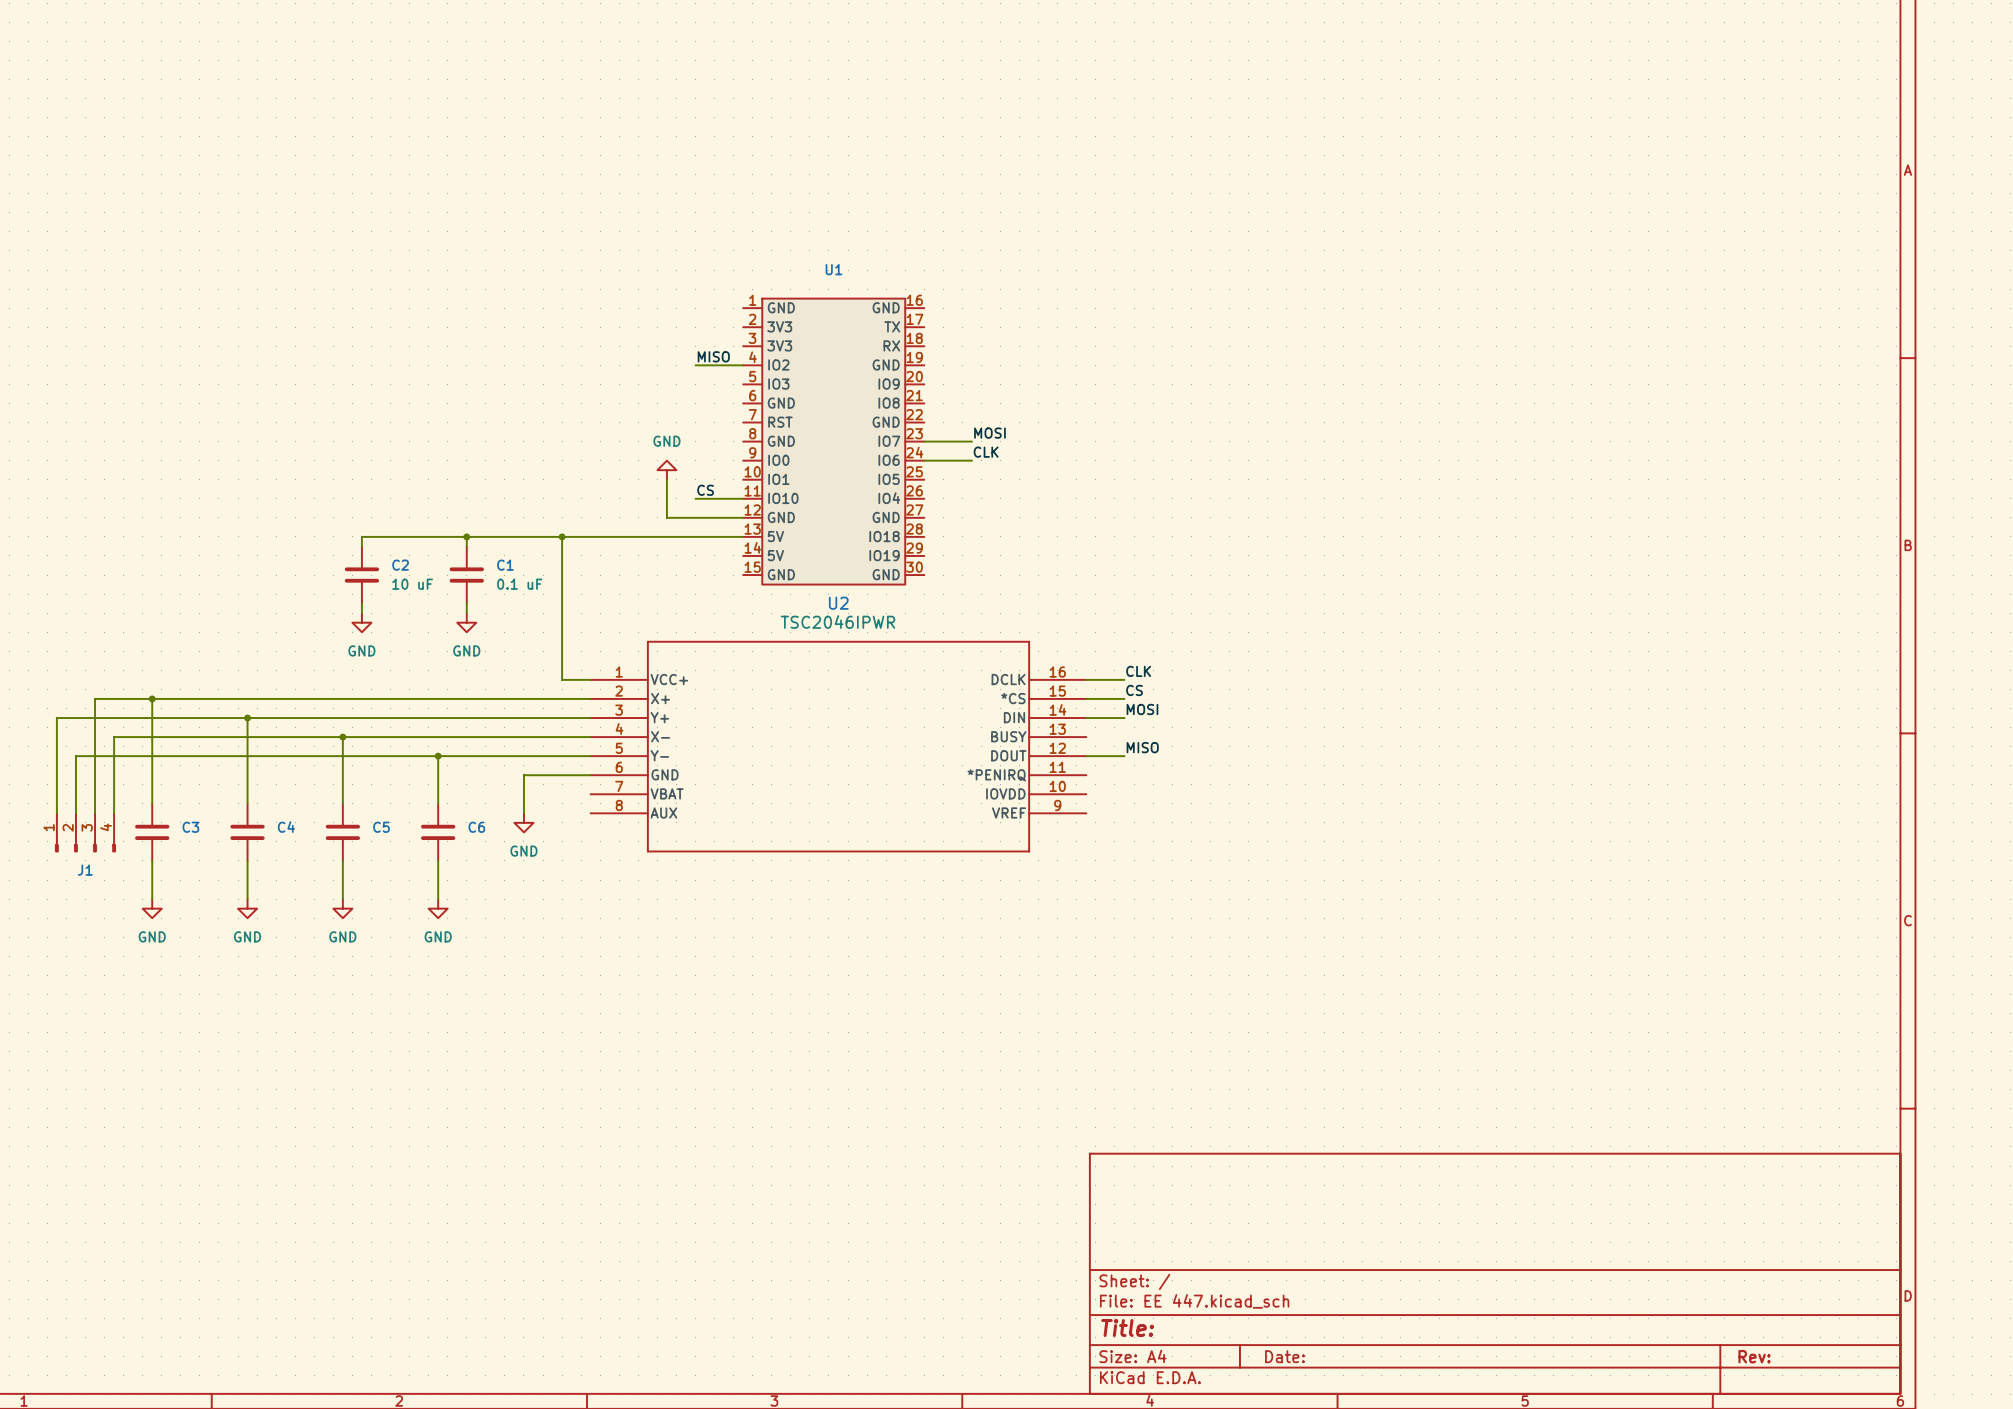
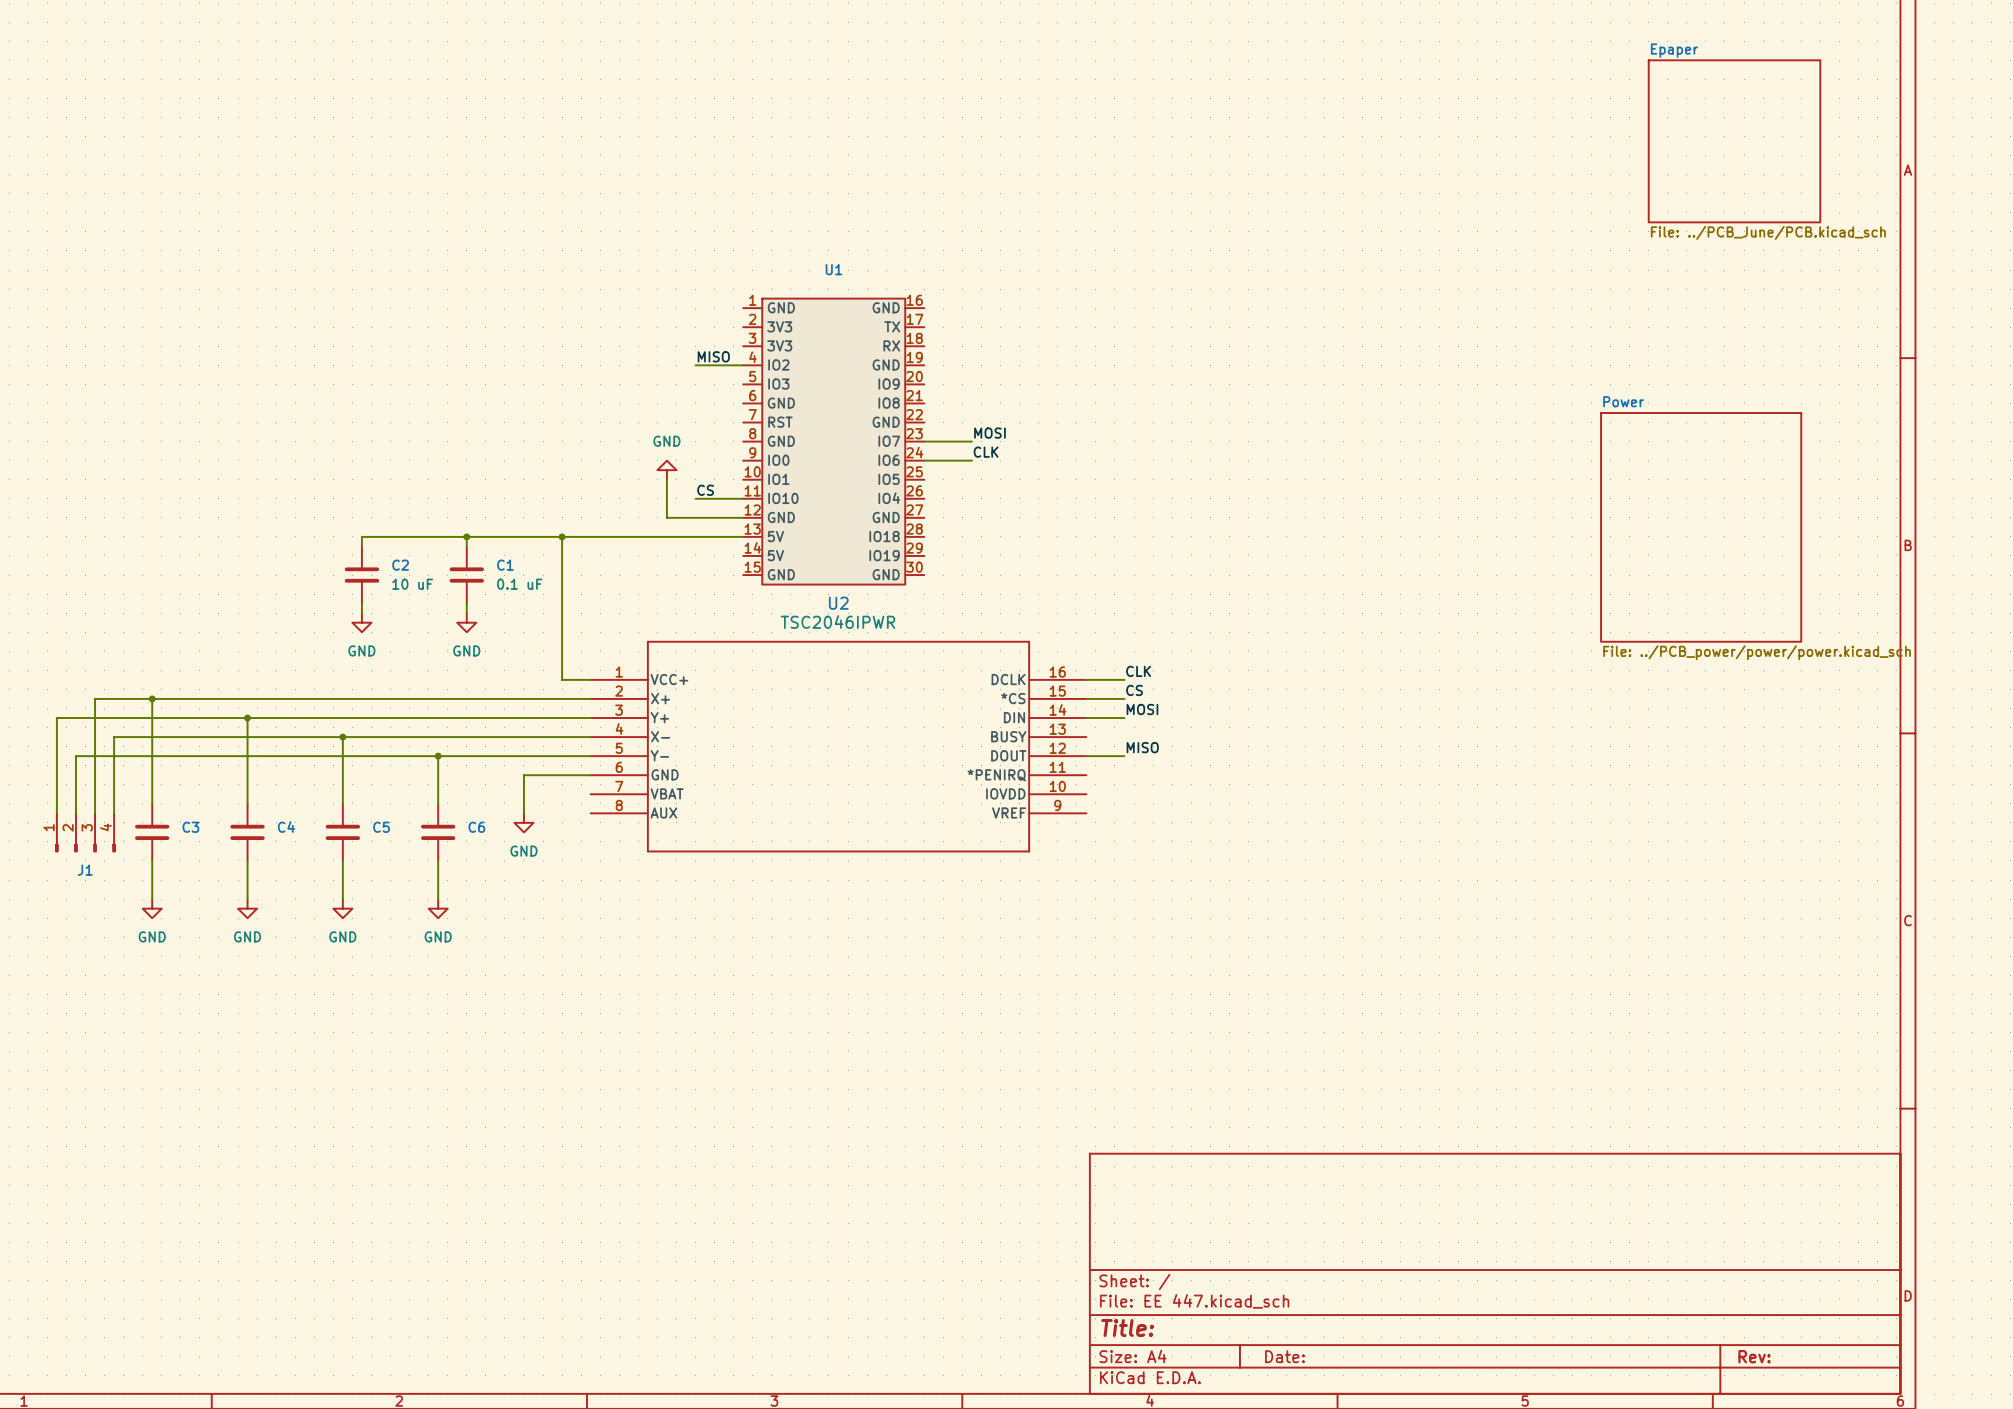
sheet Epaper: none -> File: ../PCB_June/PCB.kicad_sch (1734, 141)
sheet Power: none -> File: ../PCB_power/power/power.kicad_sch (1701, 527)

